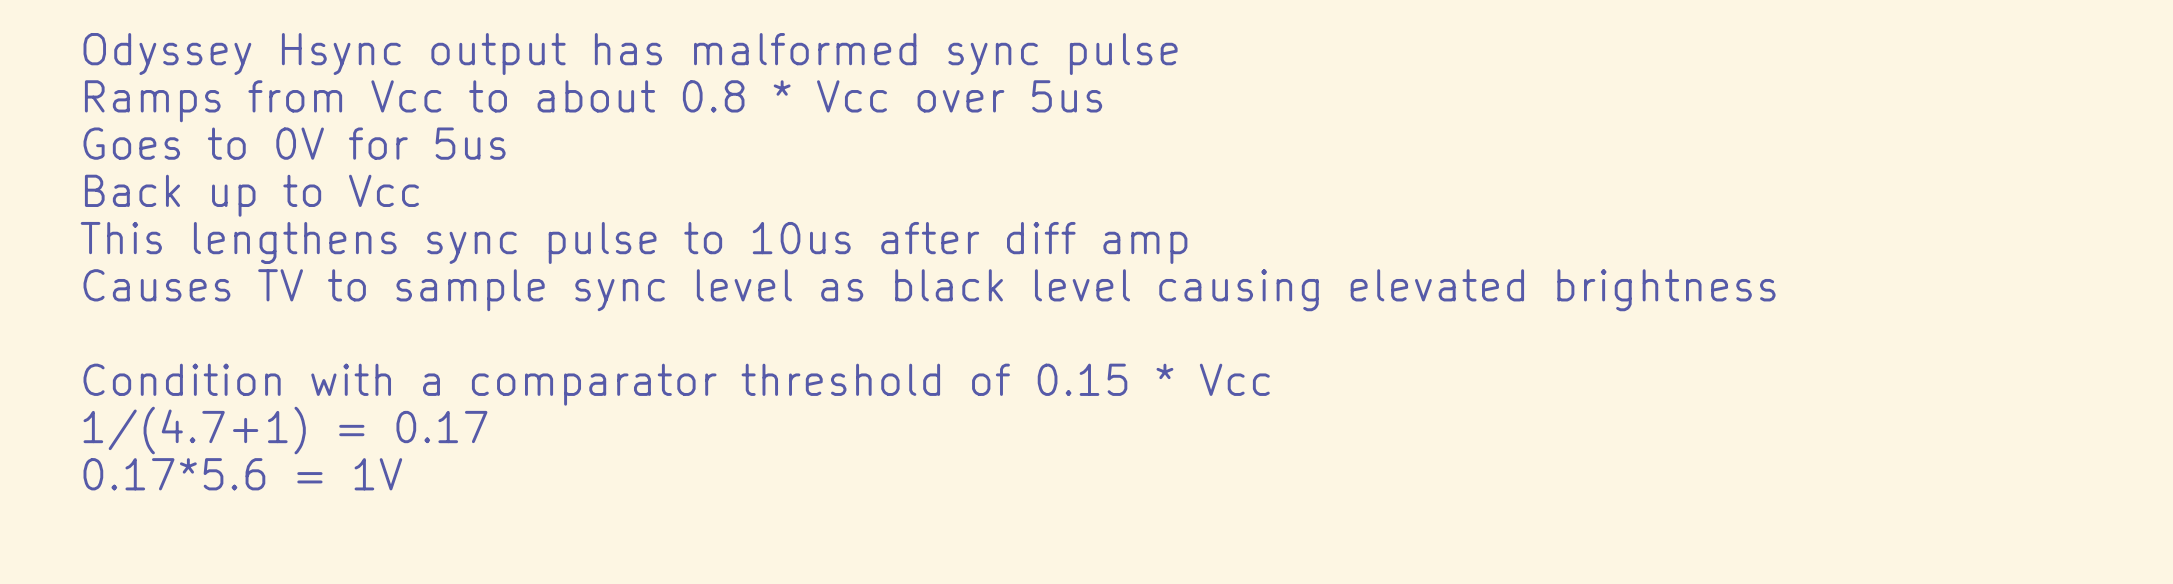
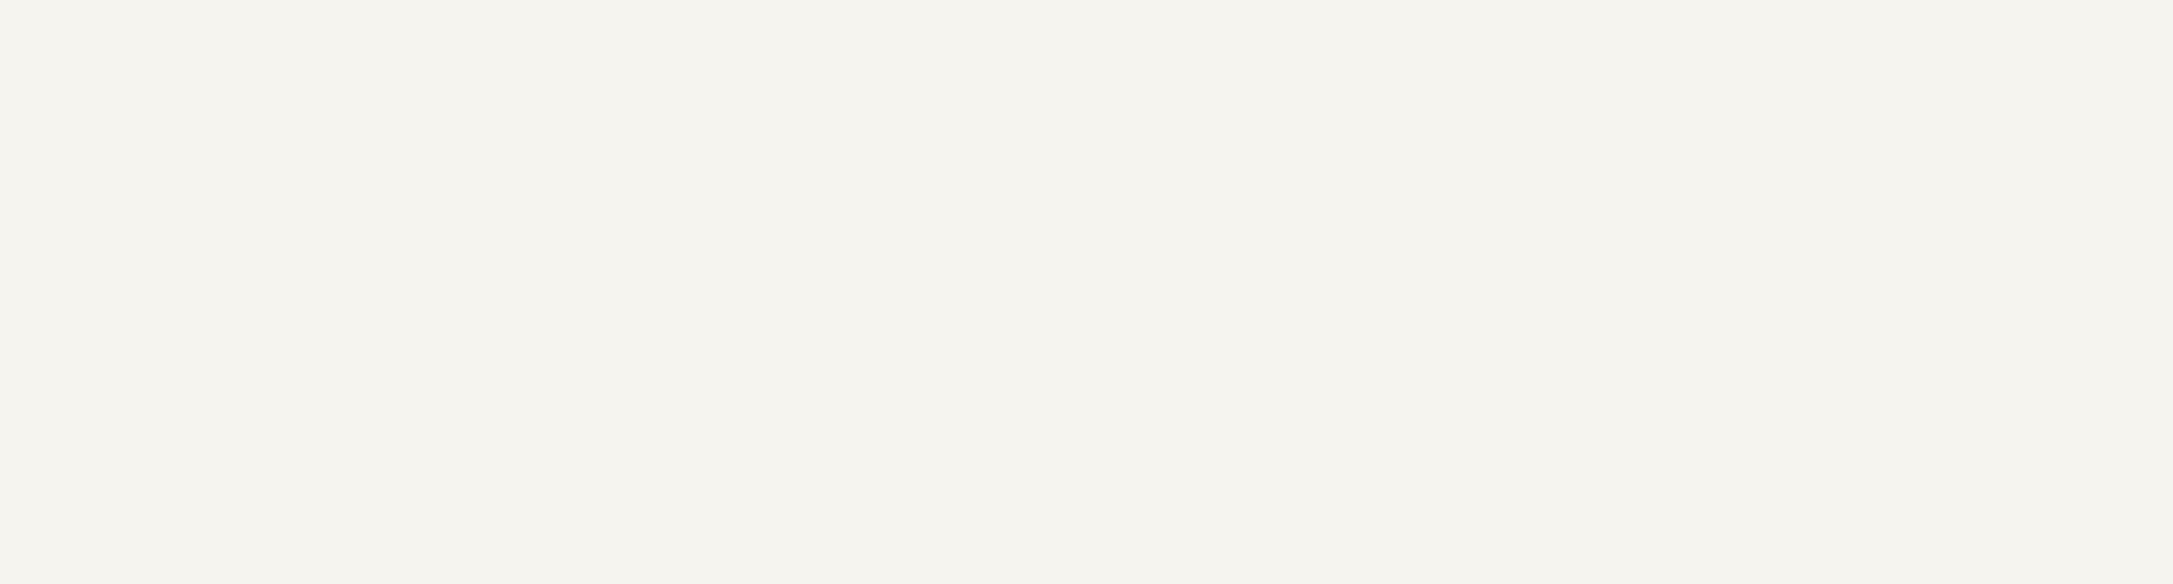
text: Odyssey Hsync output has malformed sync pulse (630, 54) -> none
text: Ramps from Vcc to about 0.8 * Vcc over 5us (593, 101) -> none
text: Goes to 0V for 5us (294, 143) -> none
text: Back up to Vcc (251, 195) -> none
text: This lengthens sync pulse to 10us after diff amp (634, 242) -> none
text: Causes TV to sample sync level as black level causing elevated brightness (929, 290) -> none
text: Condition with a comparator threshold of 0.15 * Vcc (676, 384) -> none
text: 1/(4.7+1) = 0.17 (285, 430) -> none
text: 0.17*5.6 = 1V (242, 474) -> none

